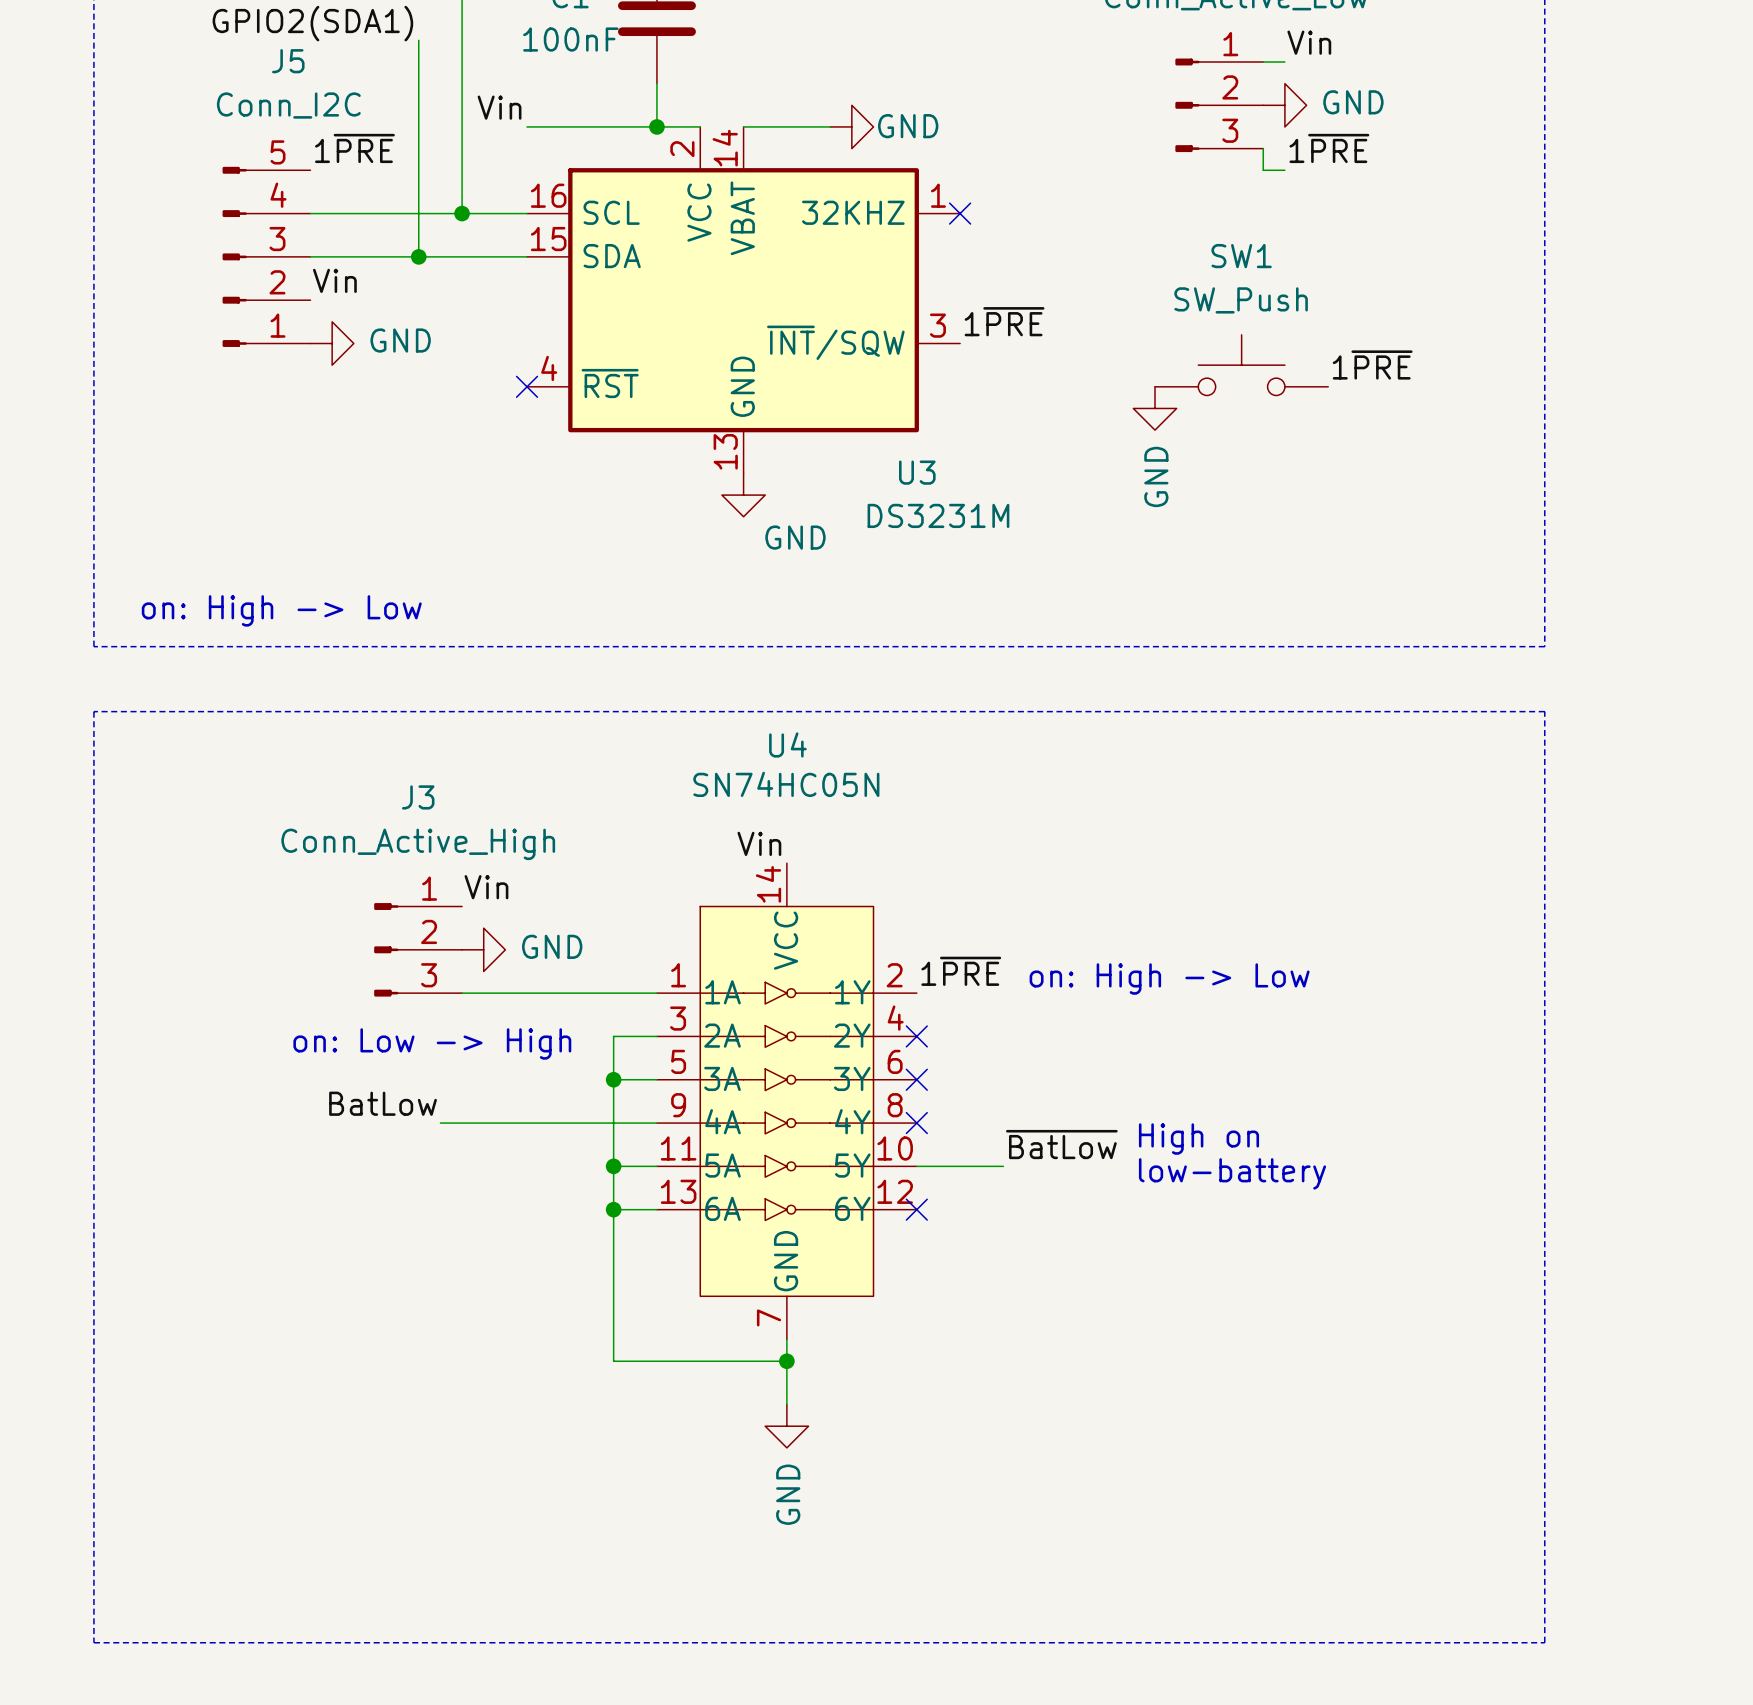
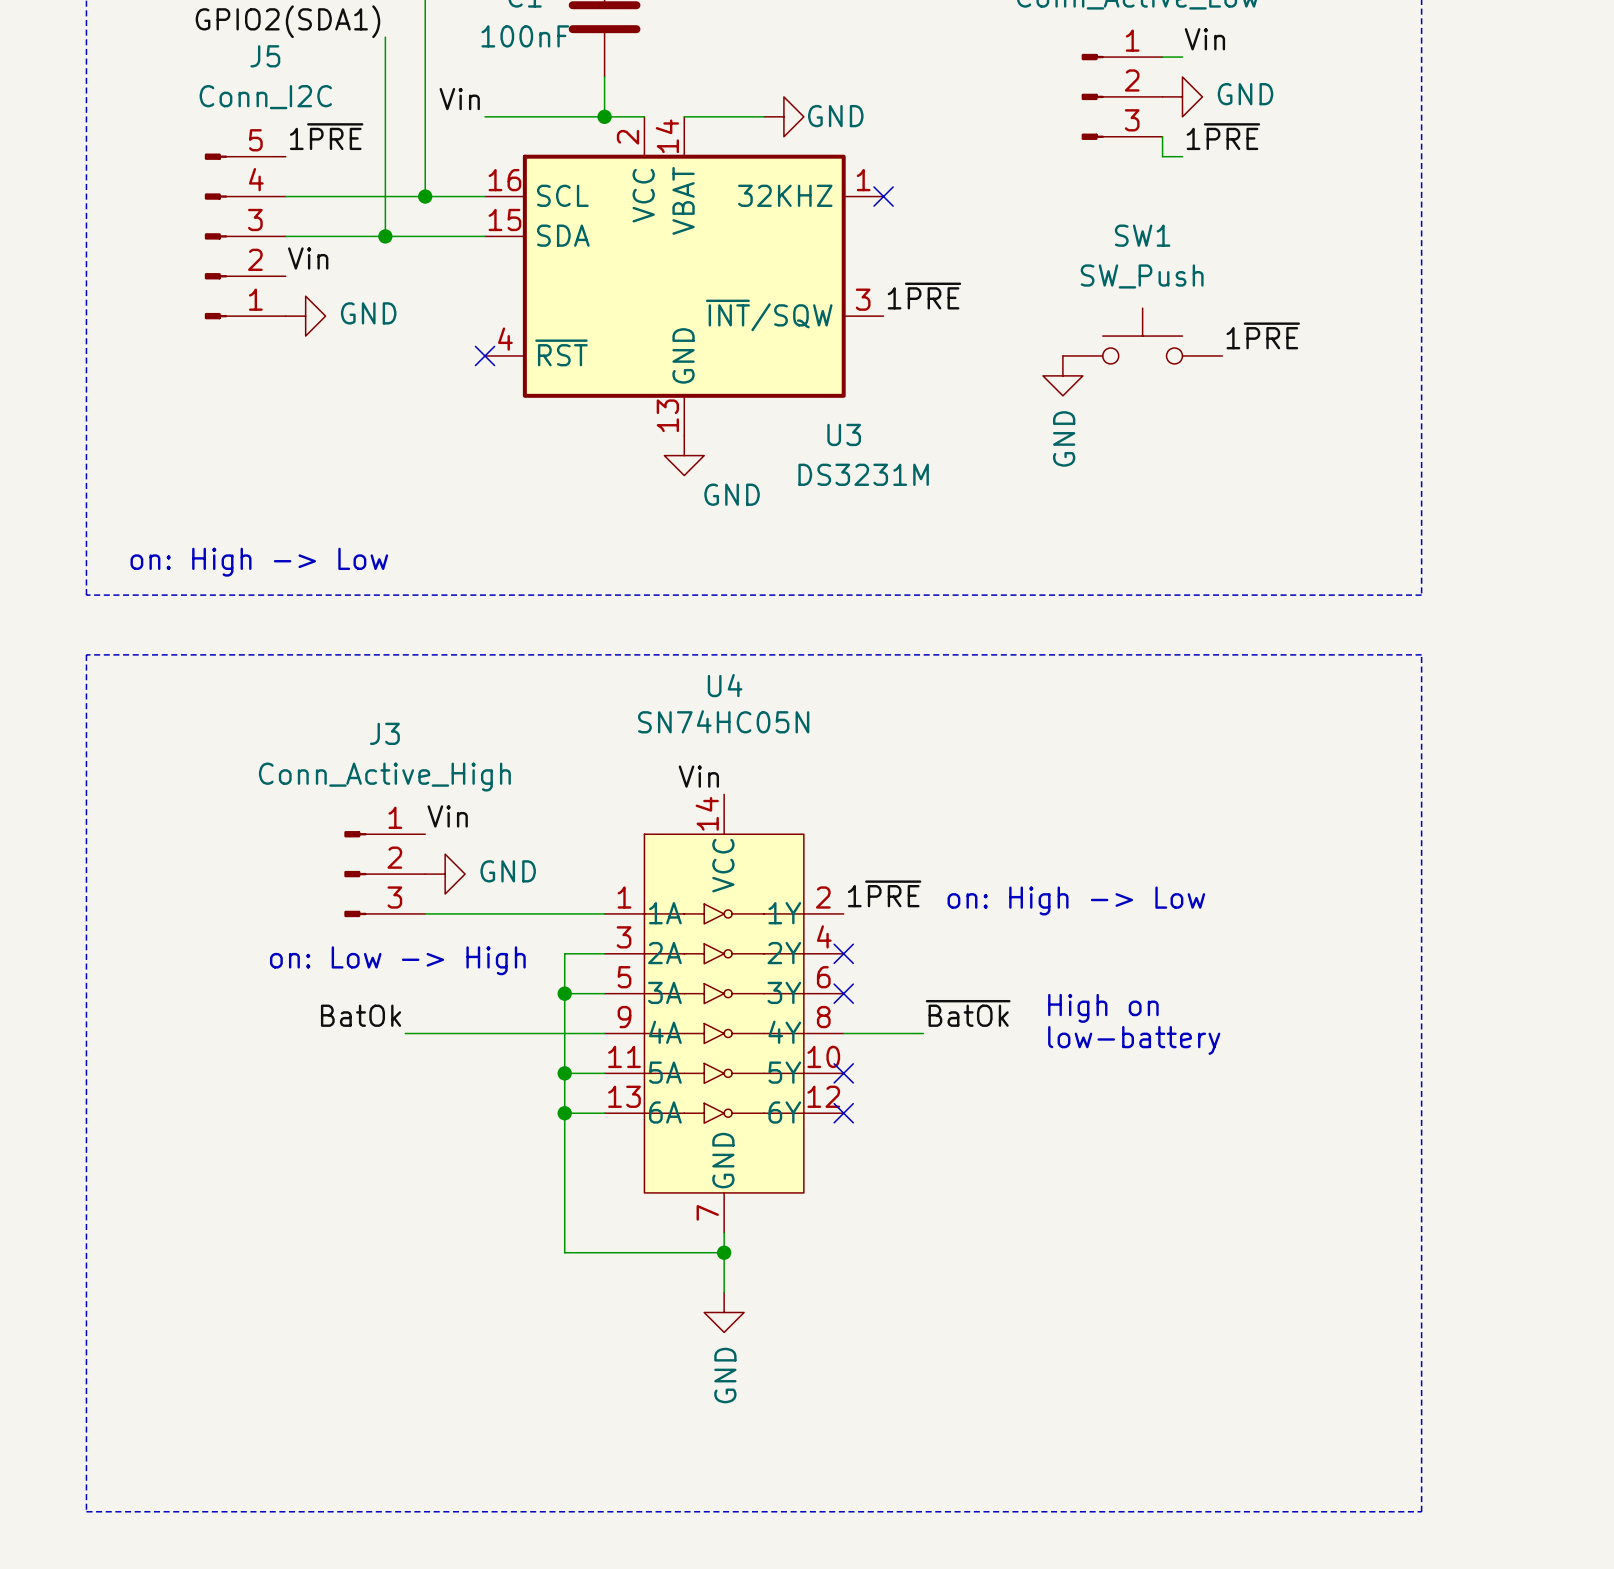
text: none -> High on (1103, 1008)
label: BatLow (383, 1103) -> BatOk (361, 1015)
no-connect mark position: (916, 1123) -> (843, 1073)
text: High on (1198, 1139) -> low-battery (1134, 1040)
label: ~{BatLow} (1061, 1144) -> ~{BatOk} (968, 1013)
wire: (916, 1166) (1003, 1166) -> (843, 1033) (923, 1033)
text: low-battery (1232, 1173) -> none

